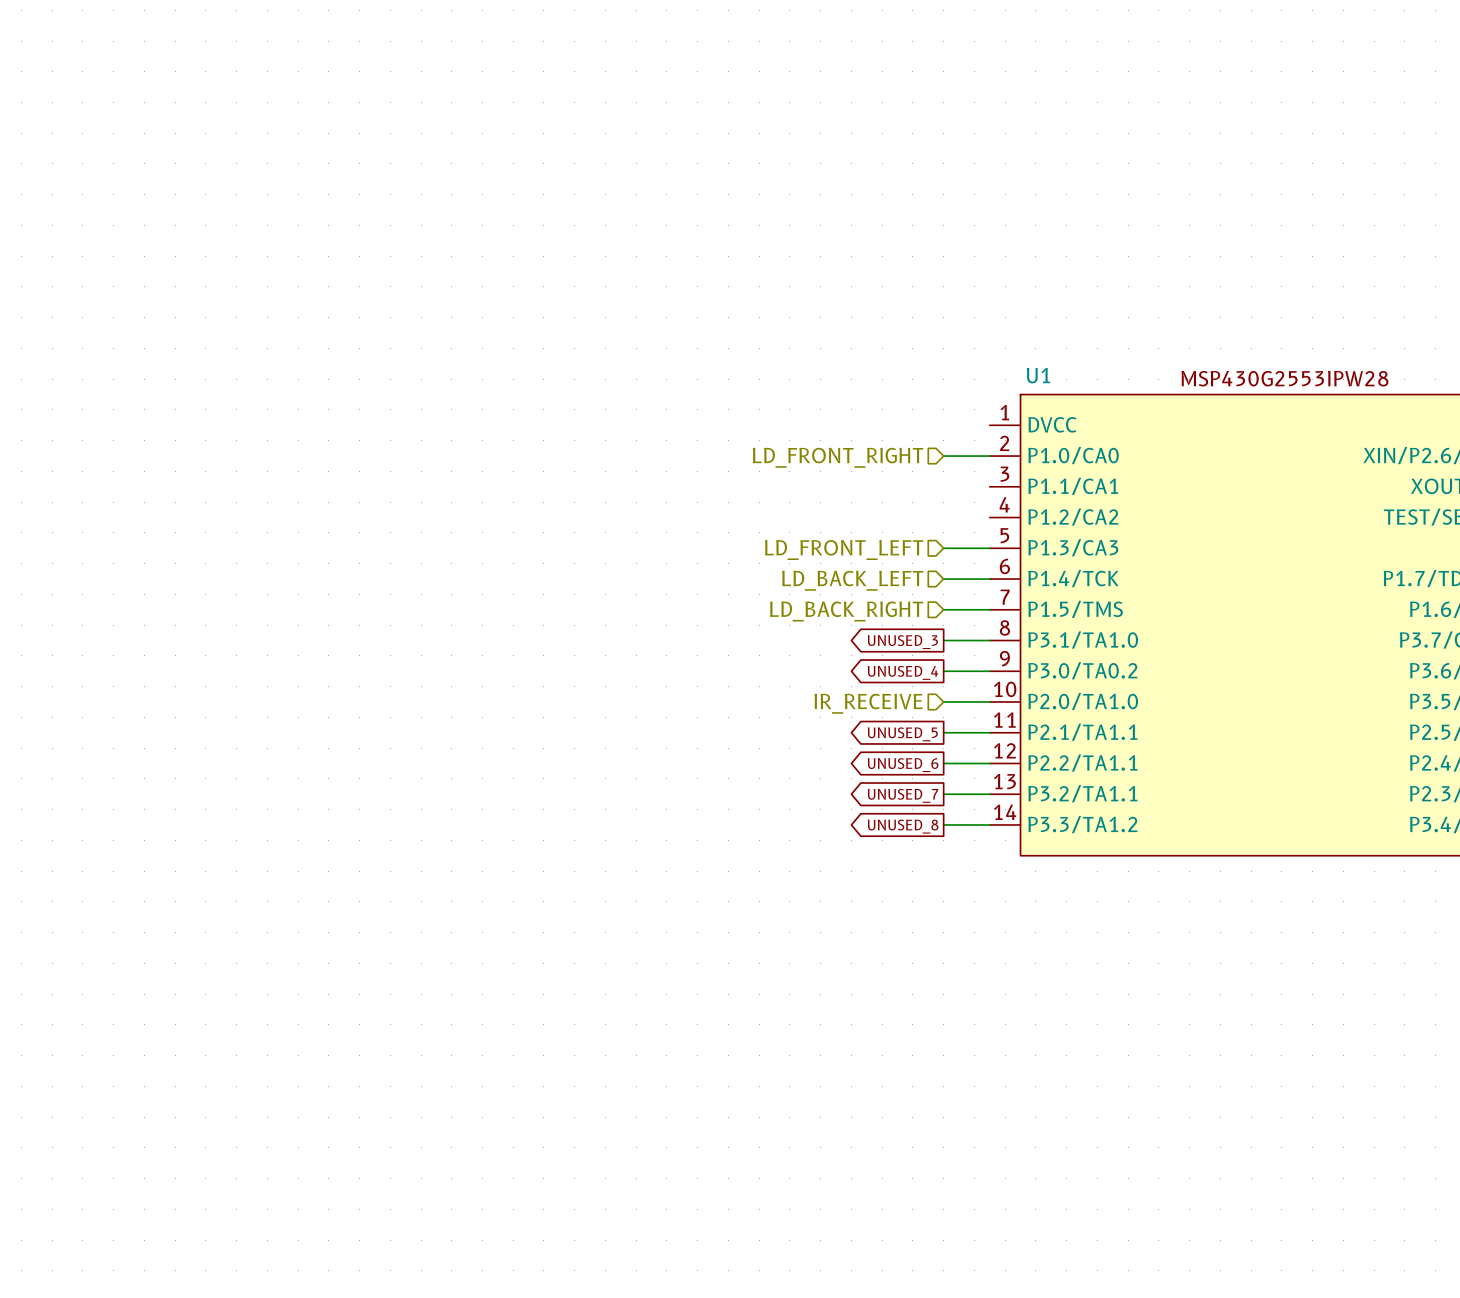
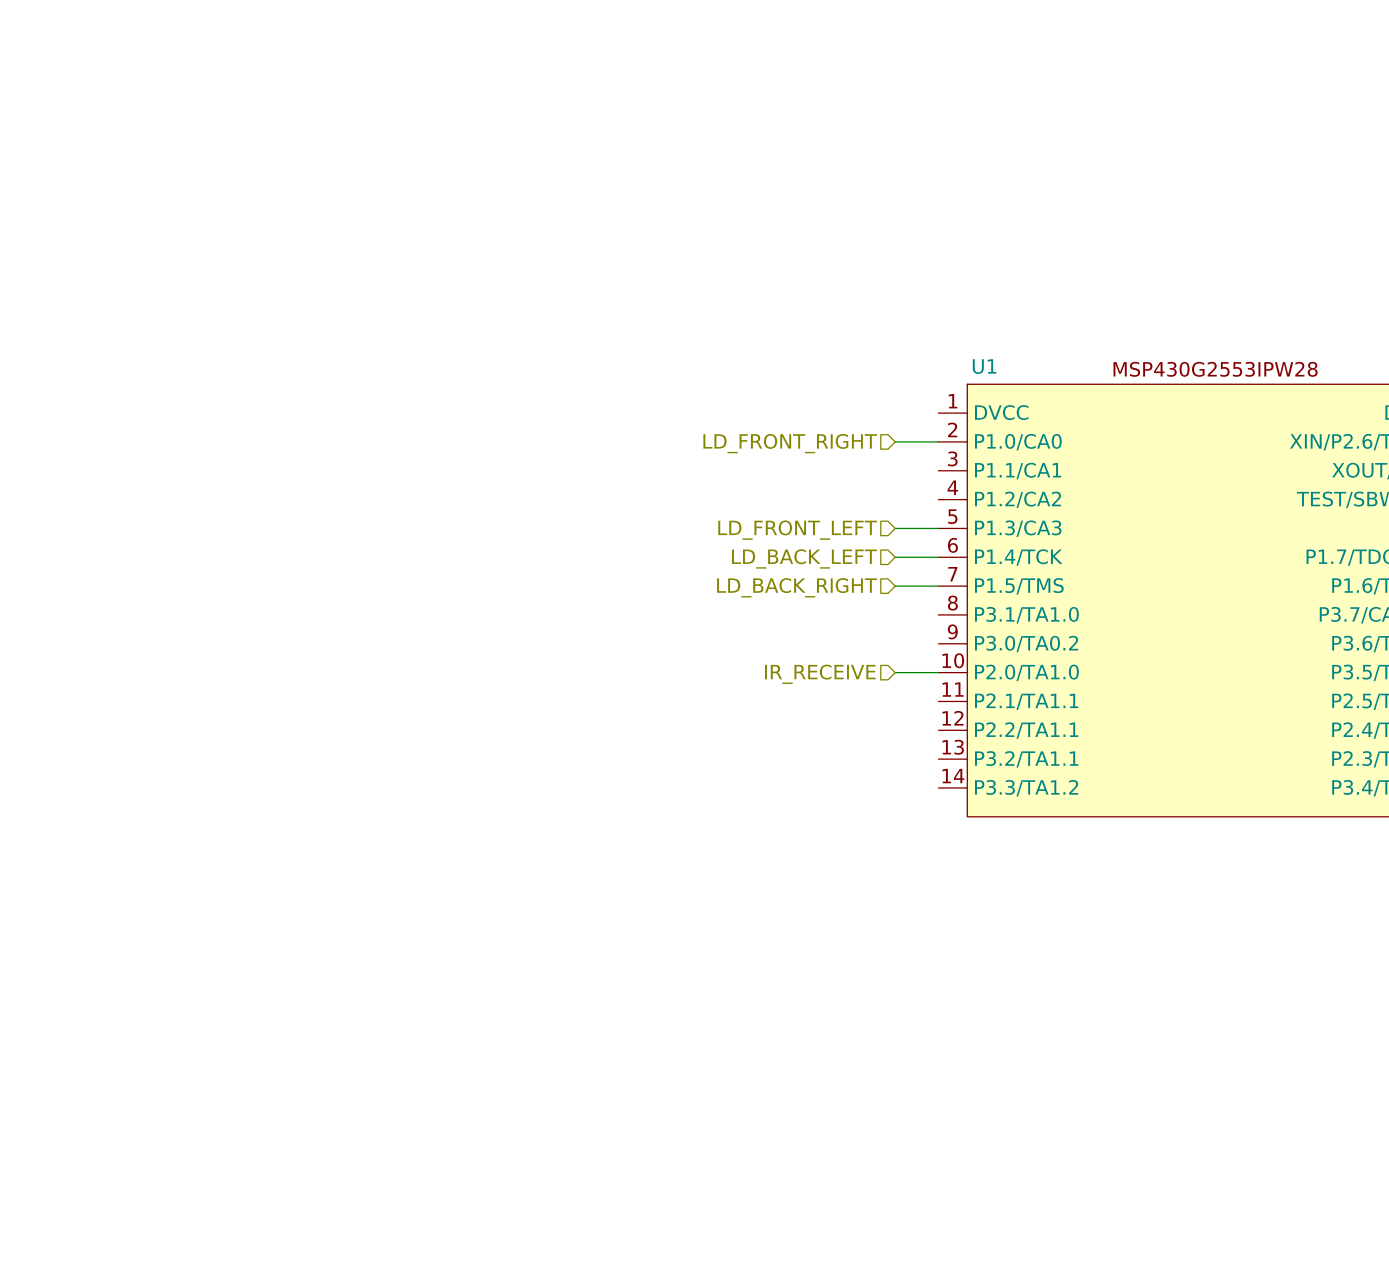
wire: (943, 640) (989, 640) -> none
global label: UNUSED_3 (902, 642) -> none
wire: (943, 671) (989, 671) -> none
global label: UNUSED_4 (902, 672) -> none
wire: (943, 732) (989, 732) -> none
global label: UNUSED_5 (902, 734) -> none
wire: (943, 763) (989, 763) -> none
global label: UNUSED_6 (903, 765) -> none
wire: (943, 794) (989, 794) -> none
global label: UNUSED_7 (902, 795) -> none
wire: (943, 824) (989, 824) -> none
global label: UNUSED_8 (903, 826) -> none

